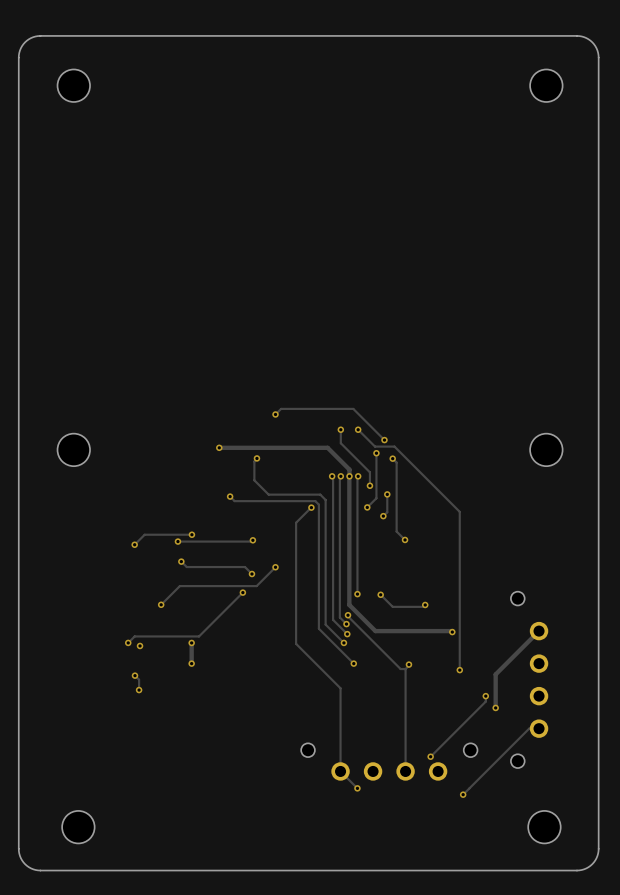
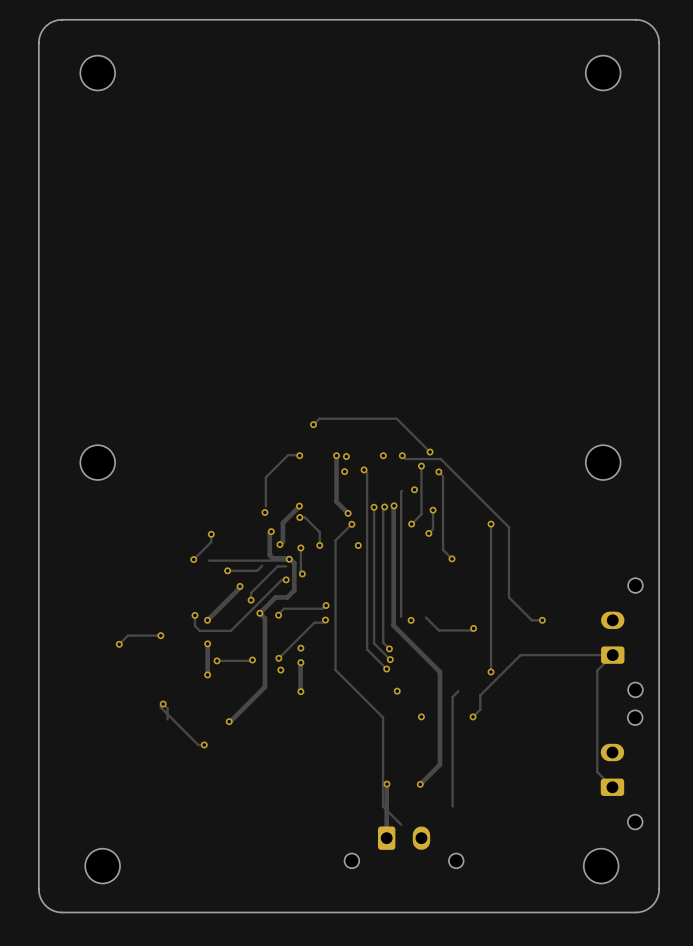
track: (340, 429) (340, 443) (369, 472) (369, 485) -> none
via: (340, 429) -> none
track: (358, 429) (375, 446) -> (402, 455) (405, 459) (419, 459)
via: (358, 429) -> none
track: none -> (299, 453) (288, 455) (265, 477) (265, 506)
track: none -> (336, 455) (336, 501) (348, 513)
via: none -> (336, 455)
via: none -> (383, 455)
via: none -> (402, 455)
via: none -> (346, 456)
track: (219, 447) (327, 447) (349, 469) (349, 476) -> none
via: (219, 447) -> none
via: none -> (364, 469)
track: (256, 458) (254, 461) (254, 480) (268, 494) (320, 494) (325, 499) -> (364, 469) (367, 472) (367, 516)
via position: (256, 458) -> (299, 455)
via: none -> (344, 471)
via: none -> (414, 489)
track: (332, 476) (333, 619) -> (374, 507) (375, 644)
via: (332, 476) -> none
track: (340, 476) (340, 618) -> (383, 507) (383, 642)
via: (340, 476) -> none
track: (349, 476) (349, 604) (375, 631) (452, 632) -> none
via: (349, 476) -> none
via: (358, 476) -> none
via: (369, 485) -> none
track: none -> (299, 506) (282, 522) (282, 541) (279, 544)
via: none -> (299, 506)
track: none -> (394, 505) (393, 625) (440, 672) (440, 764) (420, 784)
via: none -> (394, 505)
via: none -> (374, 507)
via: none -> (384, 507)
track: (230, 496) (234, 501) (315, 501) (318, 504) (318, 628) (353, 663) -> none
via: none -> (348, 513)
track: none -> (299, 517) (305, 517) (319, 532) (319, 545)
via: none -> (299, 517)
track: none -> (491, 524) (491, 672)
via: none -> (491, 524)
track: (458, 510) (459, 667) -> (508, 527) (508, 597) (531, 620) (542, 620)
track: none -> (271, 531) (269, 555) (273, 558) (289, 558) (294, 563) (294, 590) (287, 597) (275, 597) (259, 613) (264, 618) (264, 686) (229, 721)
via: none -> (271, 531)
track: none -> (211, 534) (211, 542) (193, 559)
via: none -> (211, 534)
via: none -> (279, 544)
via: none -> (319, 545)
via: none -> (358, 545)
track: none -> (300, 547) (302, 573)
via: none -> (300, 547)
track: (191, 534) (144, 534) (134, 544) -> none
via: (191, 534) -> none
via: none -> (193, 559)
via: (177, 541) -> none
via: (134, 544) -> none
track: none -> (262, 565) (257, 570) (227, 570)
track: none -> (286, 566) (277, 566) (251, 592) (251, 600)
via: none -> (227, 570)
via: none -> (302, 573)
track: none -> (286, 579) (281, 579) (230, 630) (199, 630) (194, 626) (194, 615)
via: none -> (286, 579)
track: (181, 561) (186, 567) (245, 567) (251, 574) -> none
via: (181, 561) -> none
track: none -> (240, 586) (207, 620)
via: none -> (240, 586)
track: (275, 567) (256, 586) (179, 586) (161, 604) -> none
via: (275, 567) -> none
via: (251, 574) -> none
via: none -> (251, 600)
track: none -> (326, 605) (322, 608) (284, 608) (279, 613)
via: none -> (326, 605)
via: none -> (259, 613)
via: none -> (194, 615)
track: (242, 592) (199, 636) (134, 636) (128, 642) -> none
via: (357, 594) -> none
via: (380, 594) -> none
via: none -> (207, 620)
track: none -> (325, 620) (322, 622) (314, 622) (278, 658)
via: none -> (325, 620)
via: none -> (411, 620)
via: none -> (542, 620)
via: (161, 604) -> none
track: none -> (160, 635) (127, 635) (119, 644)
via: none -> (160, 635)
part: none -> (621, 637)
track: (348, 615) (400, 669) (405, 669) -> none
via: (348, 615) -> none
via: none -> (119, 644)
track: none -> (207, 643) (207, 674)
via: none -> (207, 643)
via: none -> (300, 648)
via: none -> (278, 658)
via: (452, 632) -> none
track: none -> (252, 660) (217, 660)
via: none -> (252, 660)
via: none -> (217, 660)
track: (539, 635) (534, 635) (495, 674) (495, 707) -> none
track: none -> (300, 662) (300, 691)
via: none -> (300, 662)
via: (128, 642) -> none
track: (191, 642) (191, 663) -> none
via: (191, 642) -> none
via: none -> (280, 670)
via: (140, 645) -> none
via: none -> (491, 672)
via: none -> (207, 674)
via: (191, 663) -> none
via: none -> (300, 691)
via: (408, 664) -> none
via: (459, 670) -> none
track: none -> (160, 706) (198, 744) (204, 744)
part: (529, 679) -> none
via: none -> (421, 716)
track: none -> (473, 716) (480, 709) (480, 695) (520, 655) (612, 655) (597, 670) (597, 772) (612, 787)
via: none -> (473, 716)
via: (139, 690) -> none
via: none -> (229, 721)
track: (485, 696) (485, 701) (430, 756) -> none
via: (485, 696) -> none
via: (495, 707) -> none
via: none -> (204, 744)
track: (541, 728) (529, 728) (463, 794) -> none
part: none -> (621, 769)
track: none -> (386, 784) (386, 838)
via: none -> (386, 784)
via: none -> (420, 784)
via: (430, 756) -> none
part: (389, 762) -> none
via: (357, 788) -> none
via: (463, 794) -> none
part: none -> (404, 847)

